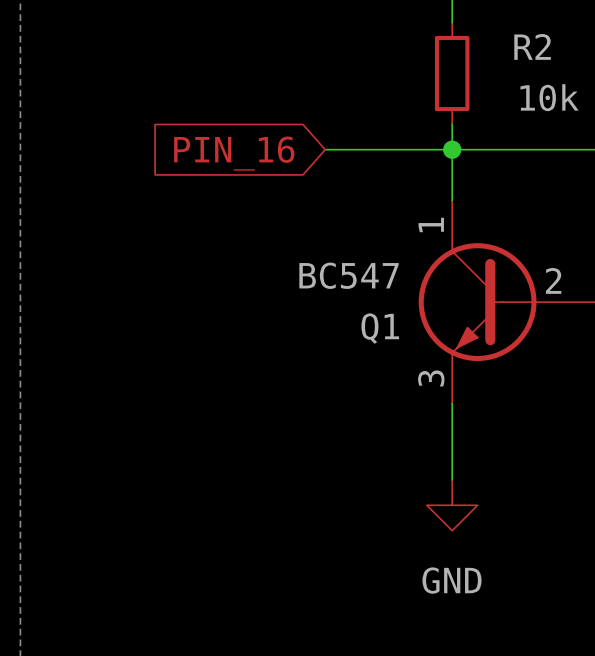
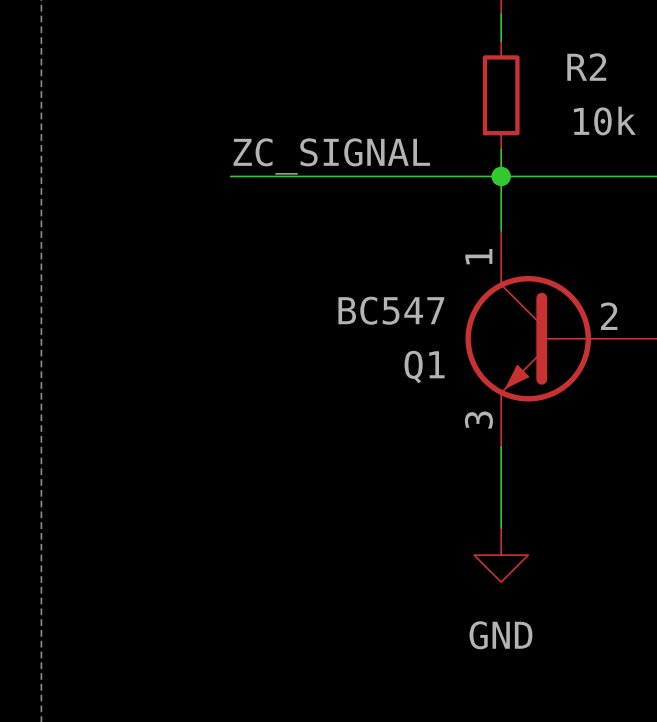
label: none -> ZC_SIGNAL (331, 156)
wire: none -> (230, 176) (365, 176)
global label: PIN_16 (234, 153) -> none

